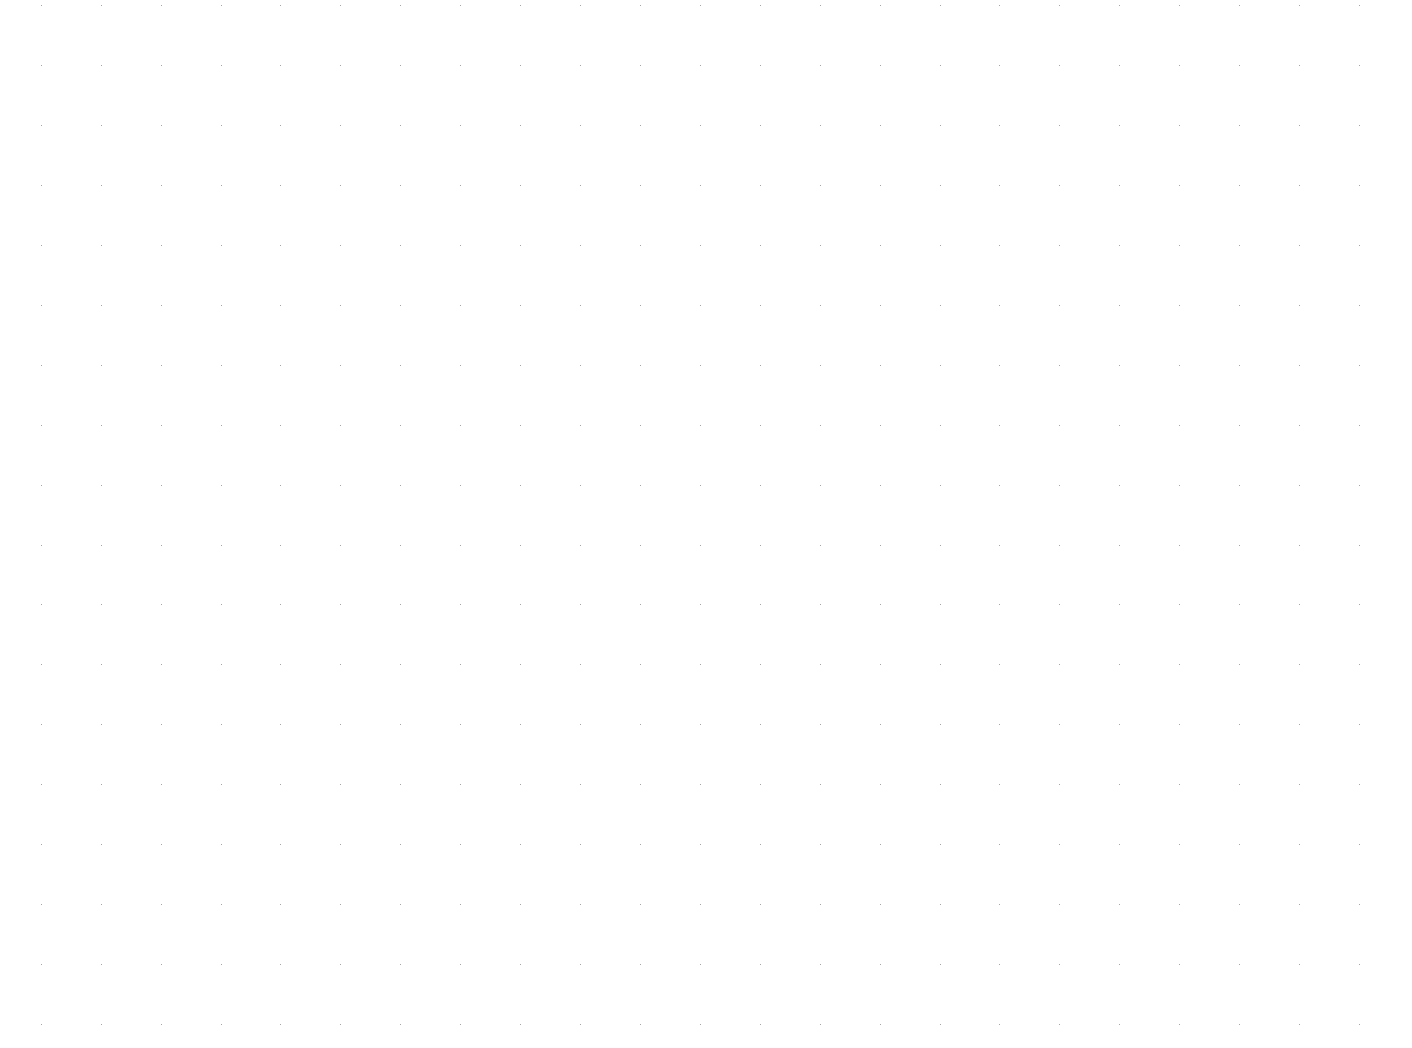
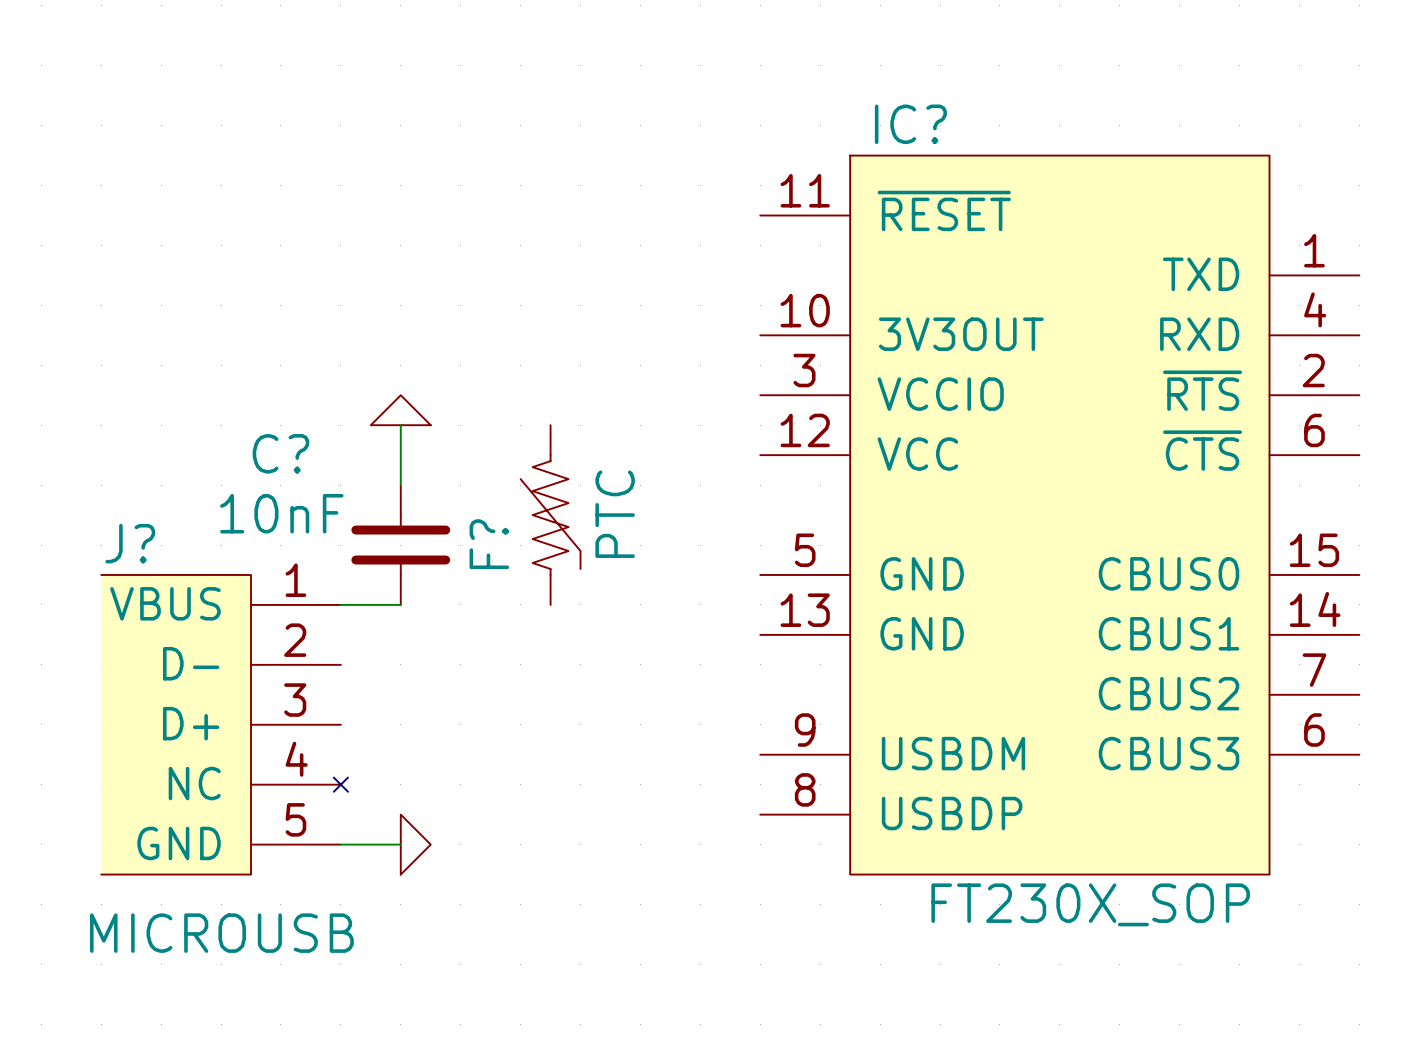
power symbol: none -> (400, 410)
wire: none -> (400, 425) (400, 485)
F?: none -> PTC (550, 515)
IC?: none -> FT230X_SOP (1059, 515)
C?: none -> 10nF (400, 545)
wire: none -> (340, 604) (400, 604)
J?: none -> MICROUSB (224, 724)
wire: none -> (340, 844) (400, 844)
power symbol: none -> (415, 844)

